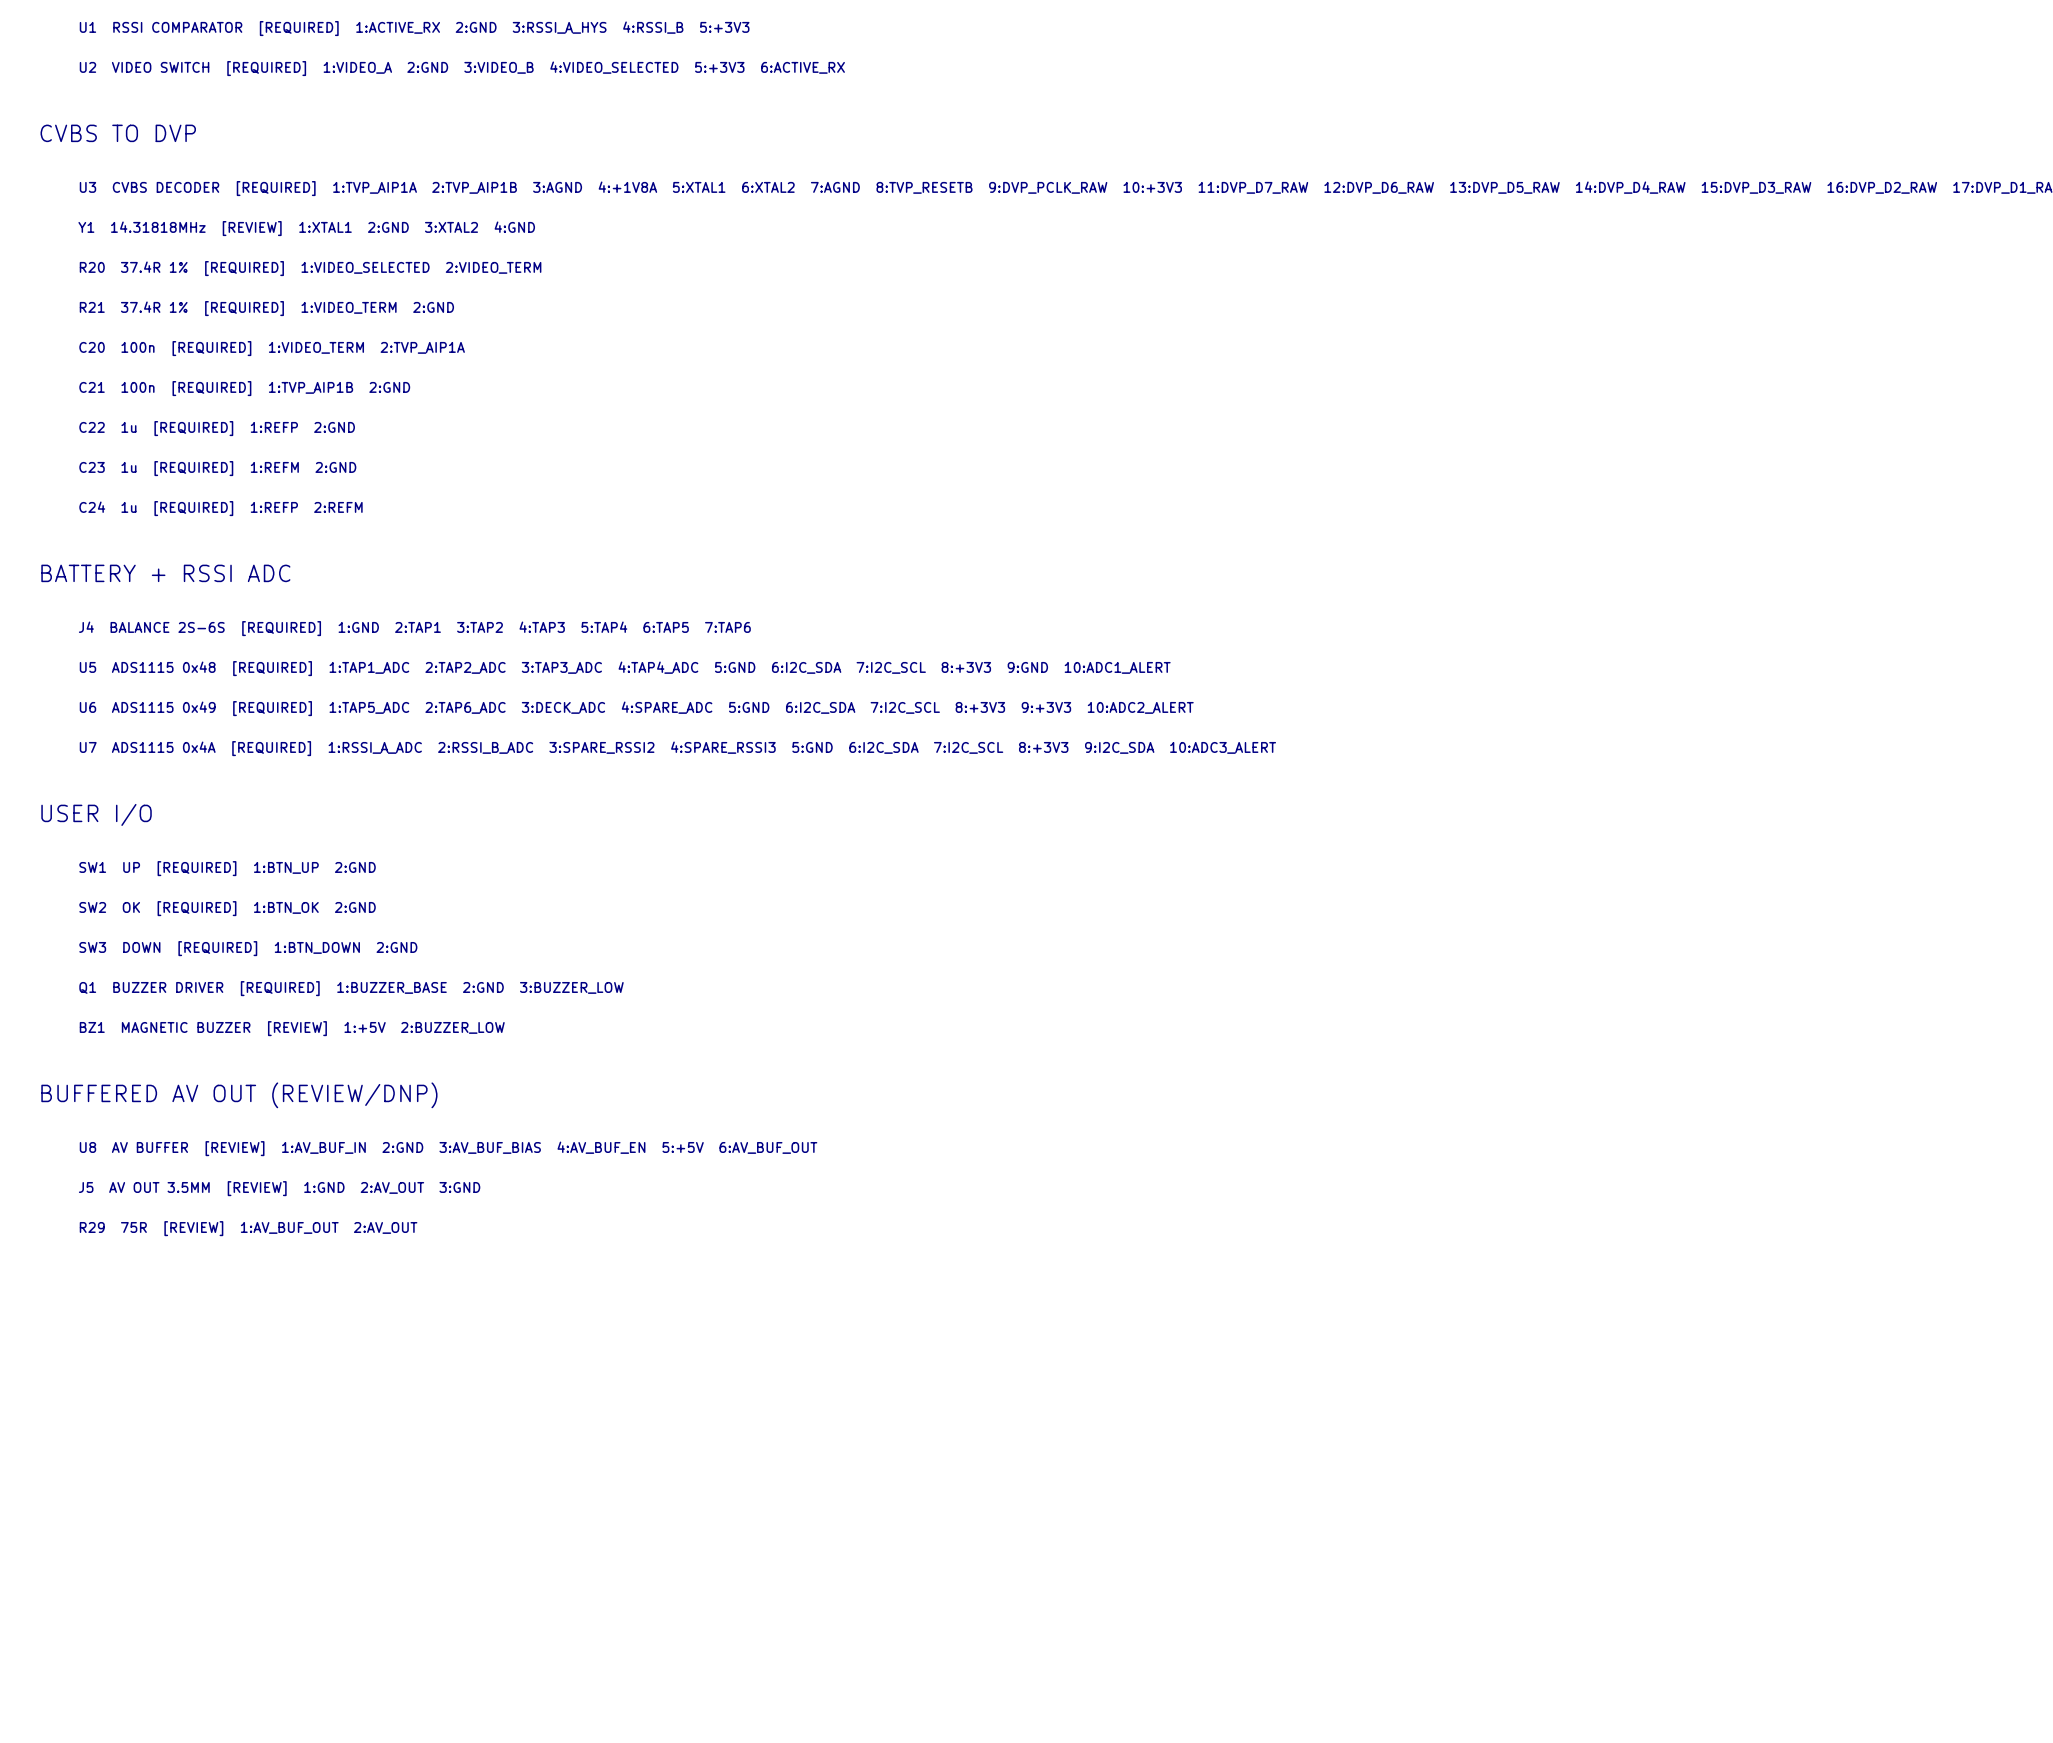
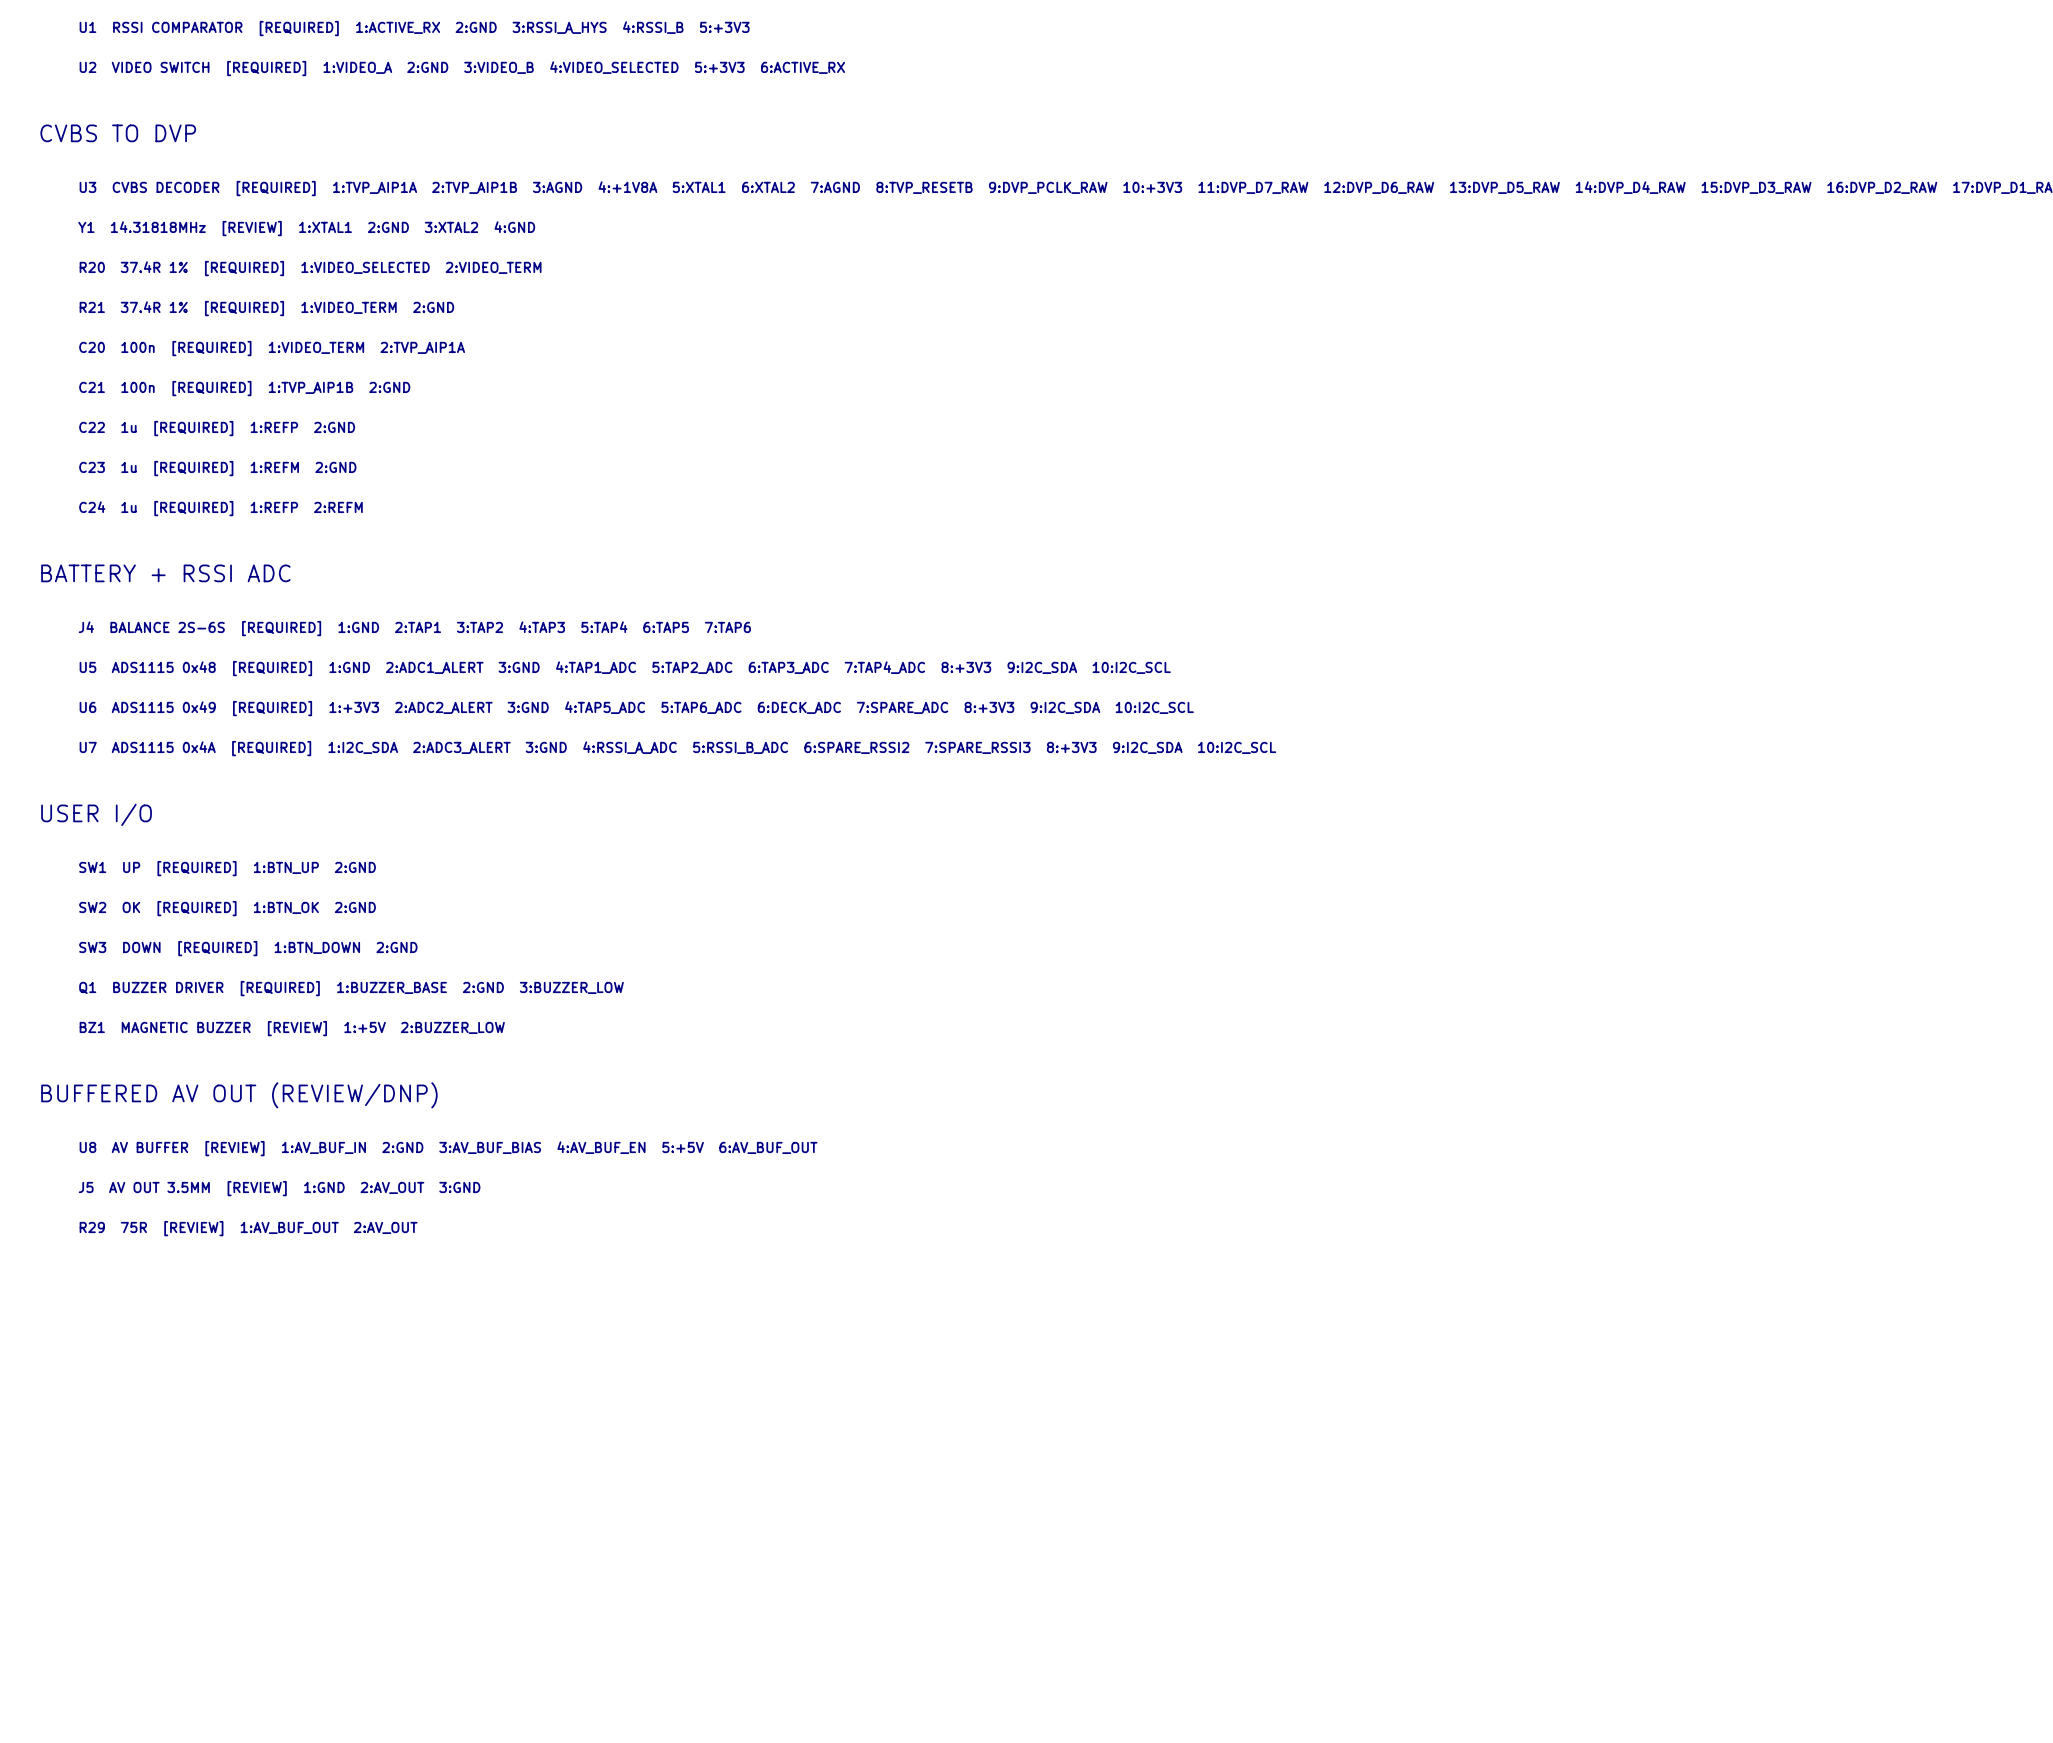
text: U5 ADS1115 0x48 [REQUIRED] 1:TAP1_ADC 2:TAP2_ADC 3:TAP3_ADC 4:TAP4_ADC 5:GND 6:I2C_SDA 7:I2C_SCL 8:+3V3 9:GND 10:ADC1_ALERT (625, 668) -> U5 ADS1115 0x48 [REQUIRED] 1:GND 2:ADC1_ALERT 3:GND 4:TAP1_ADC 5:TAP2_ADC 6:TAP3_ADC 7:TAP4_ADC 8:+3V3 9:I2C_SDA 10:I2C_SCL (625, 668)
text: U6 ADS1115 0x49 [REQUIRED] 1:TAP5_ADC 2:TAP6_ADC 3:DECK_ADC 4:SPARE_ADC 5:GND 6:I2C_SDA 7:I2C_SCL 8:+3V3 9:+3V3 10:ADC2_ALERT (636, 708) -> U6 ADS1115 0x49 [REQUIRED] 1:+3V3 2:ADC2_ALERT 3:GND 4:TAP5_ADC 5:TAP6_ADC 6:DECK_ADC 7:SPARE_ADC 8:+3V3 9:I2C_SDA 10:I2C_SCL (636, 708)
text: U7 ADS1115 0x4A [REQUIRED] 1:RSSI_A_ADC 2:RSSI_B_ADC 3:SPARE_RSSI2 4:SPARE_RSSI3 5:GND 6:I2C_SDA 7:I2C_SCL 8:+3V3 9:I2C_SDA 10:ADC3_ALERT (677, 748) -> U7 ADS1115 0x4A [REQUIRED] 1:I2C_SDA 2:ADC3_ALERT 3:GND 4:RSSI_A_ADC 5:RSSI_B_ADC 6:SPARE_RSSI2 7:SPARE_RSSI3 8:+3V3 9:I2C_SDA 10:I2C_SCL (677, 748)

